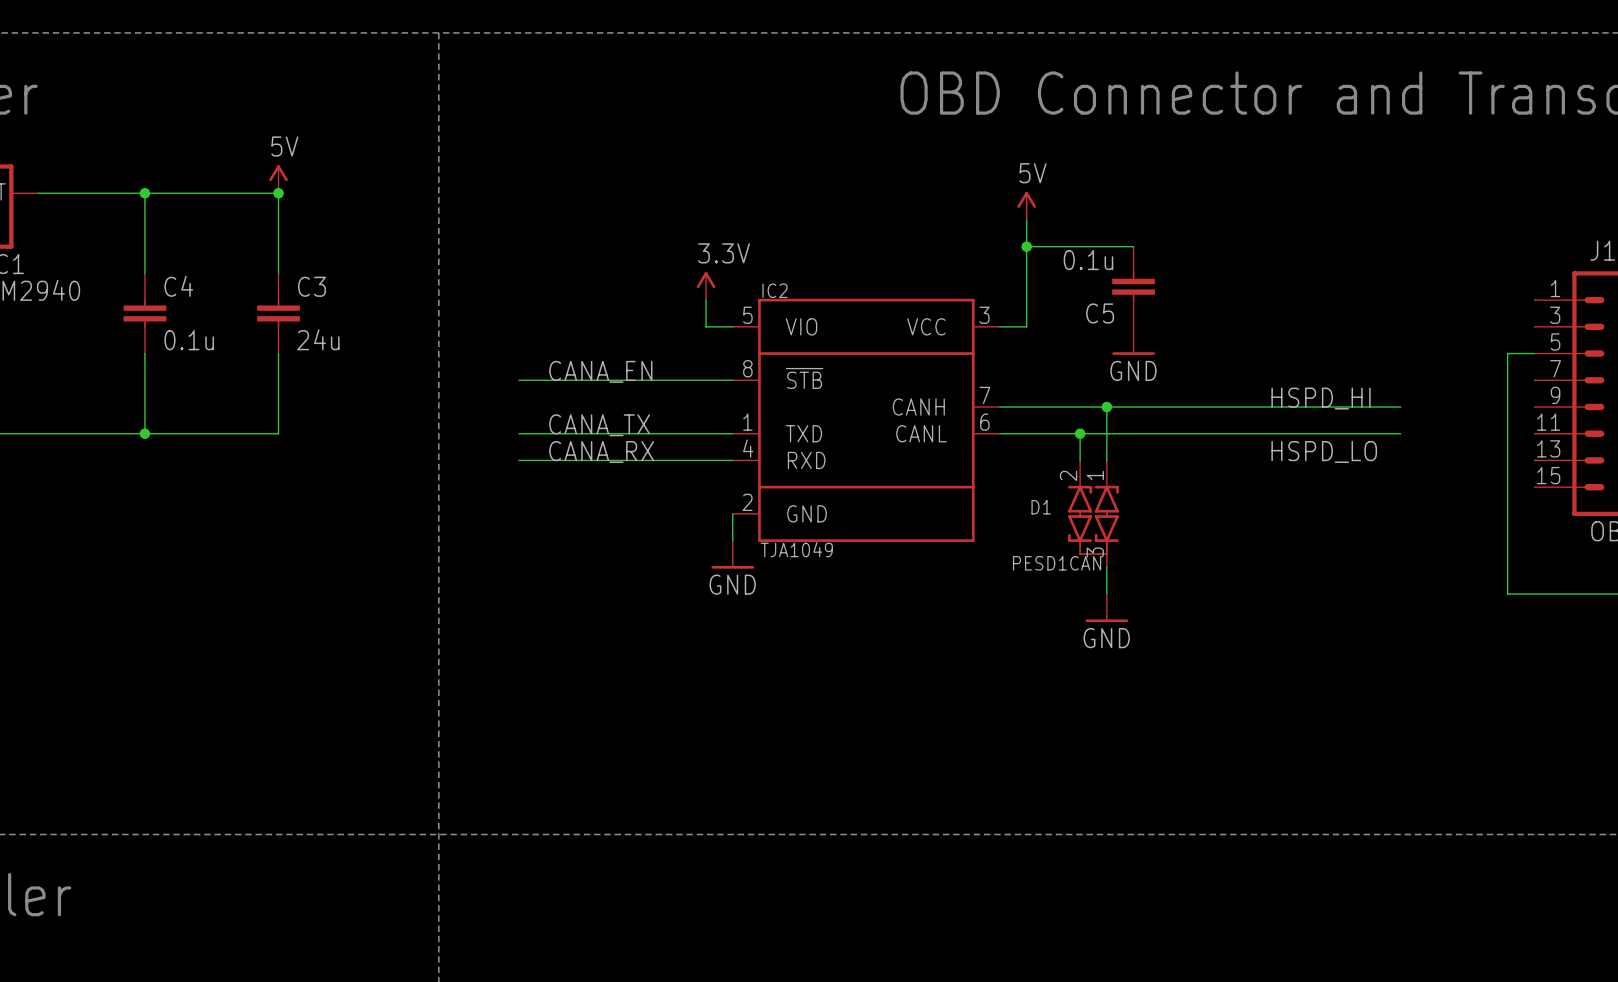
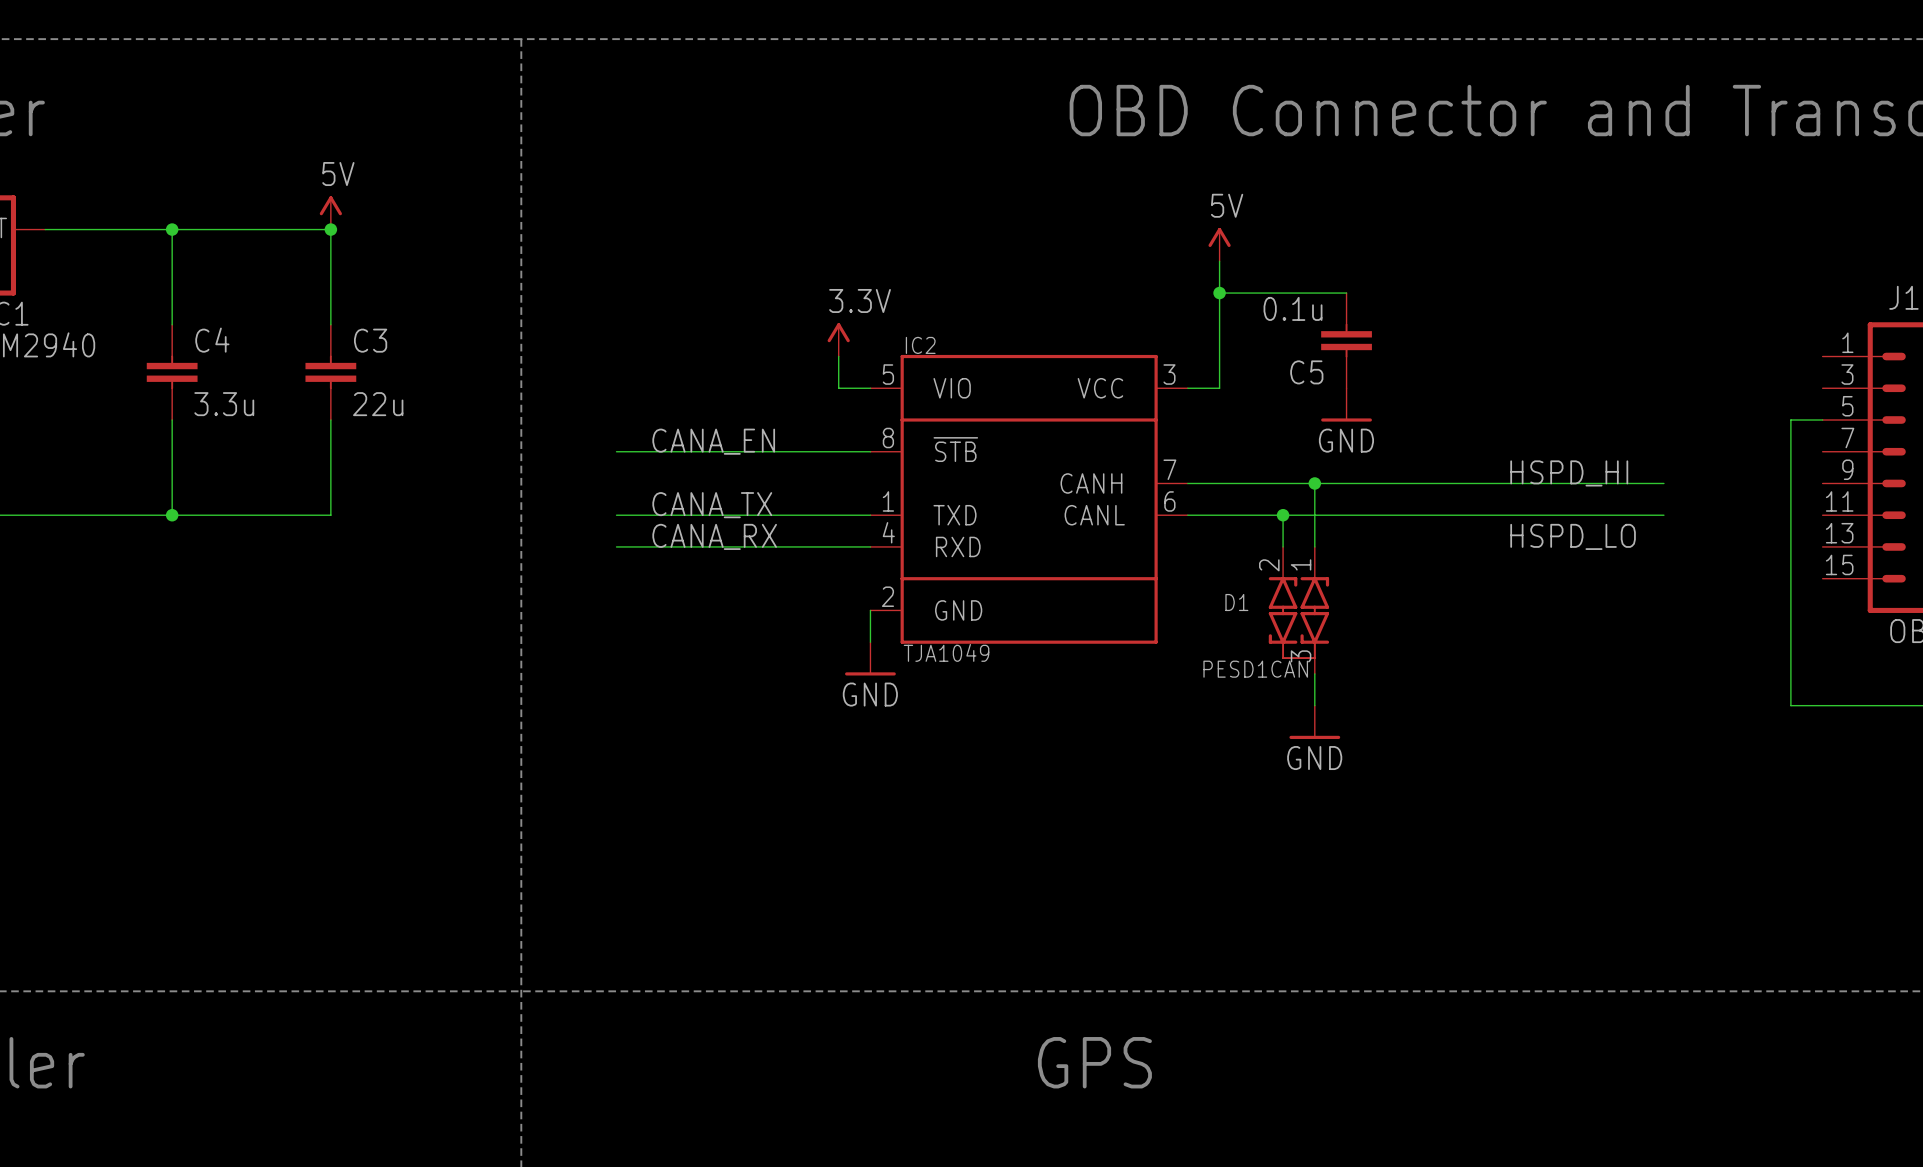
C3 value: 24u (318, 339) -> 22u (378, 404)
C4 value: 0.1u (189, 340) -> 3.3u (224, 404)
text: none -> GPS (1094, 1062)

